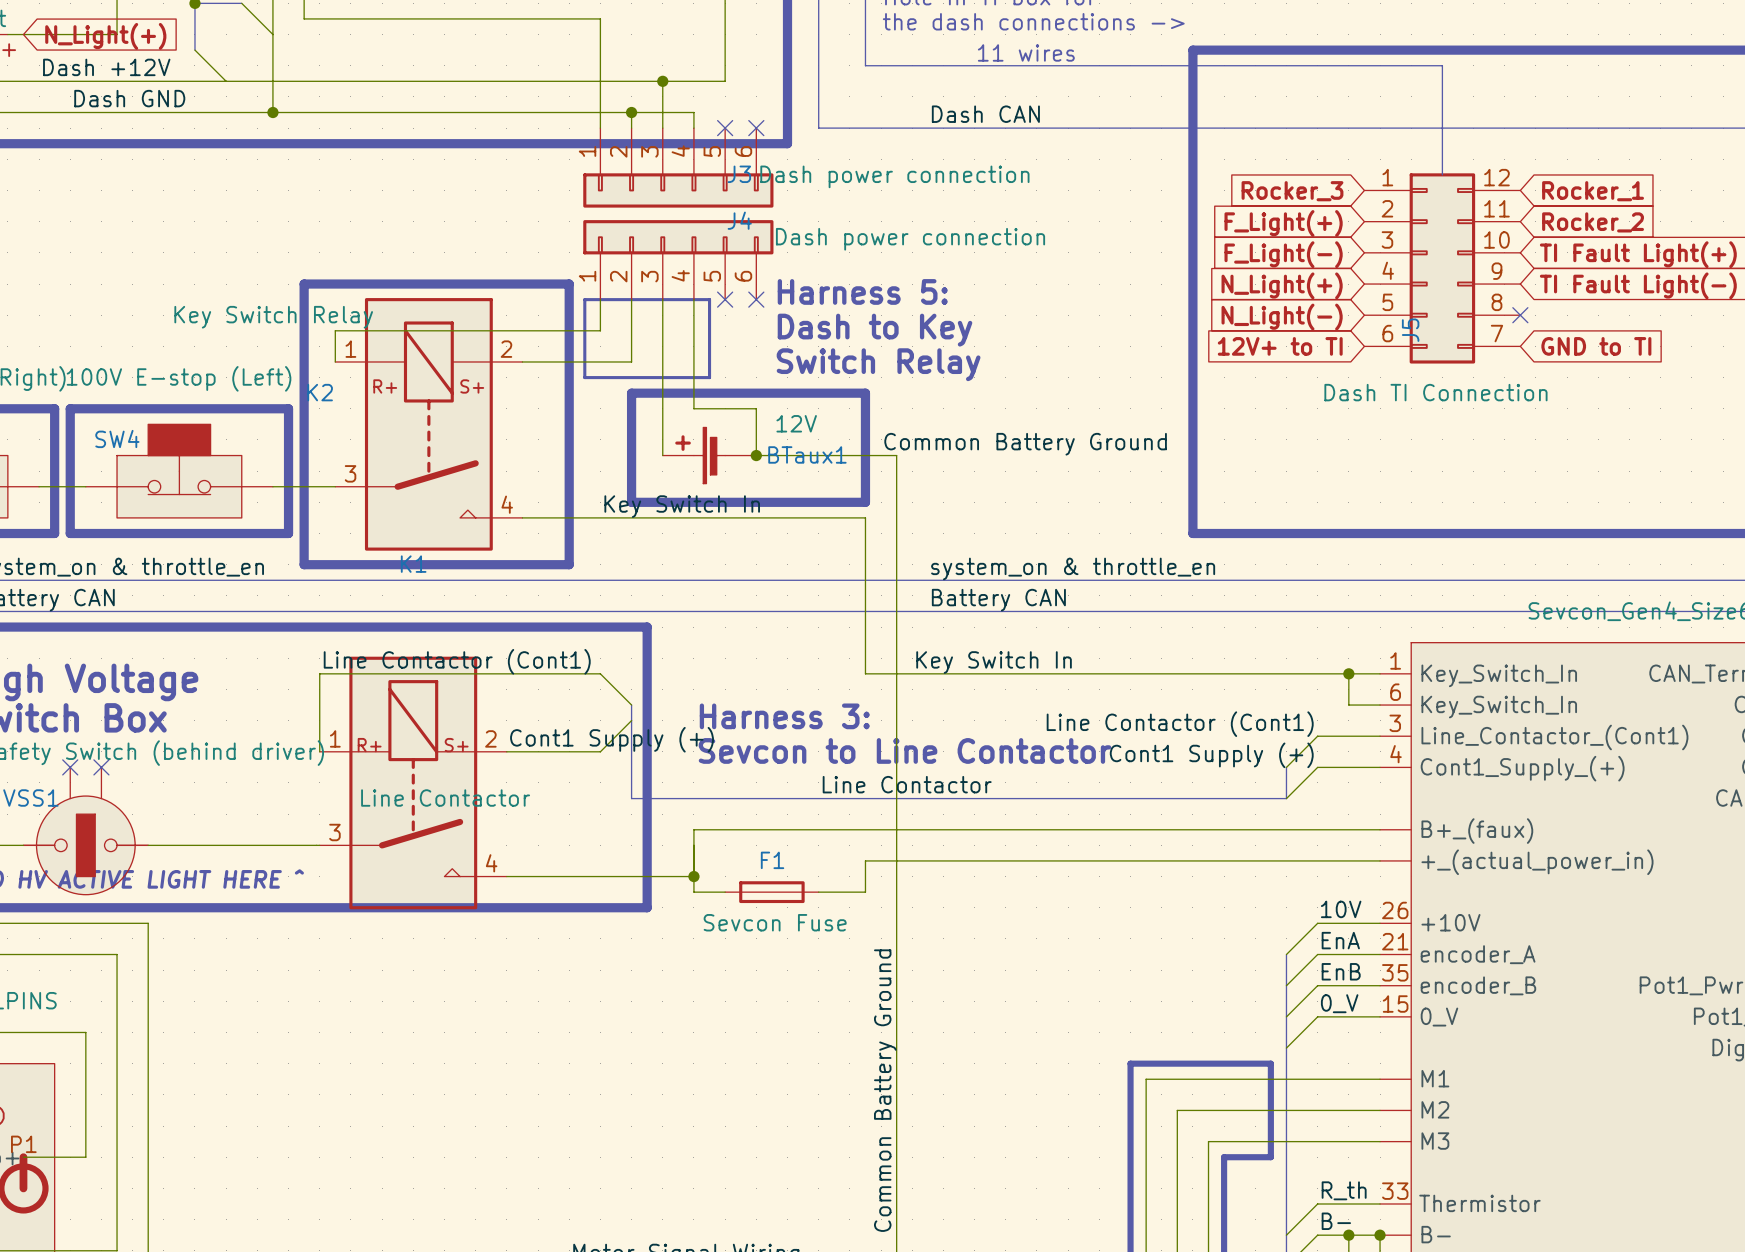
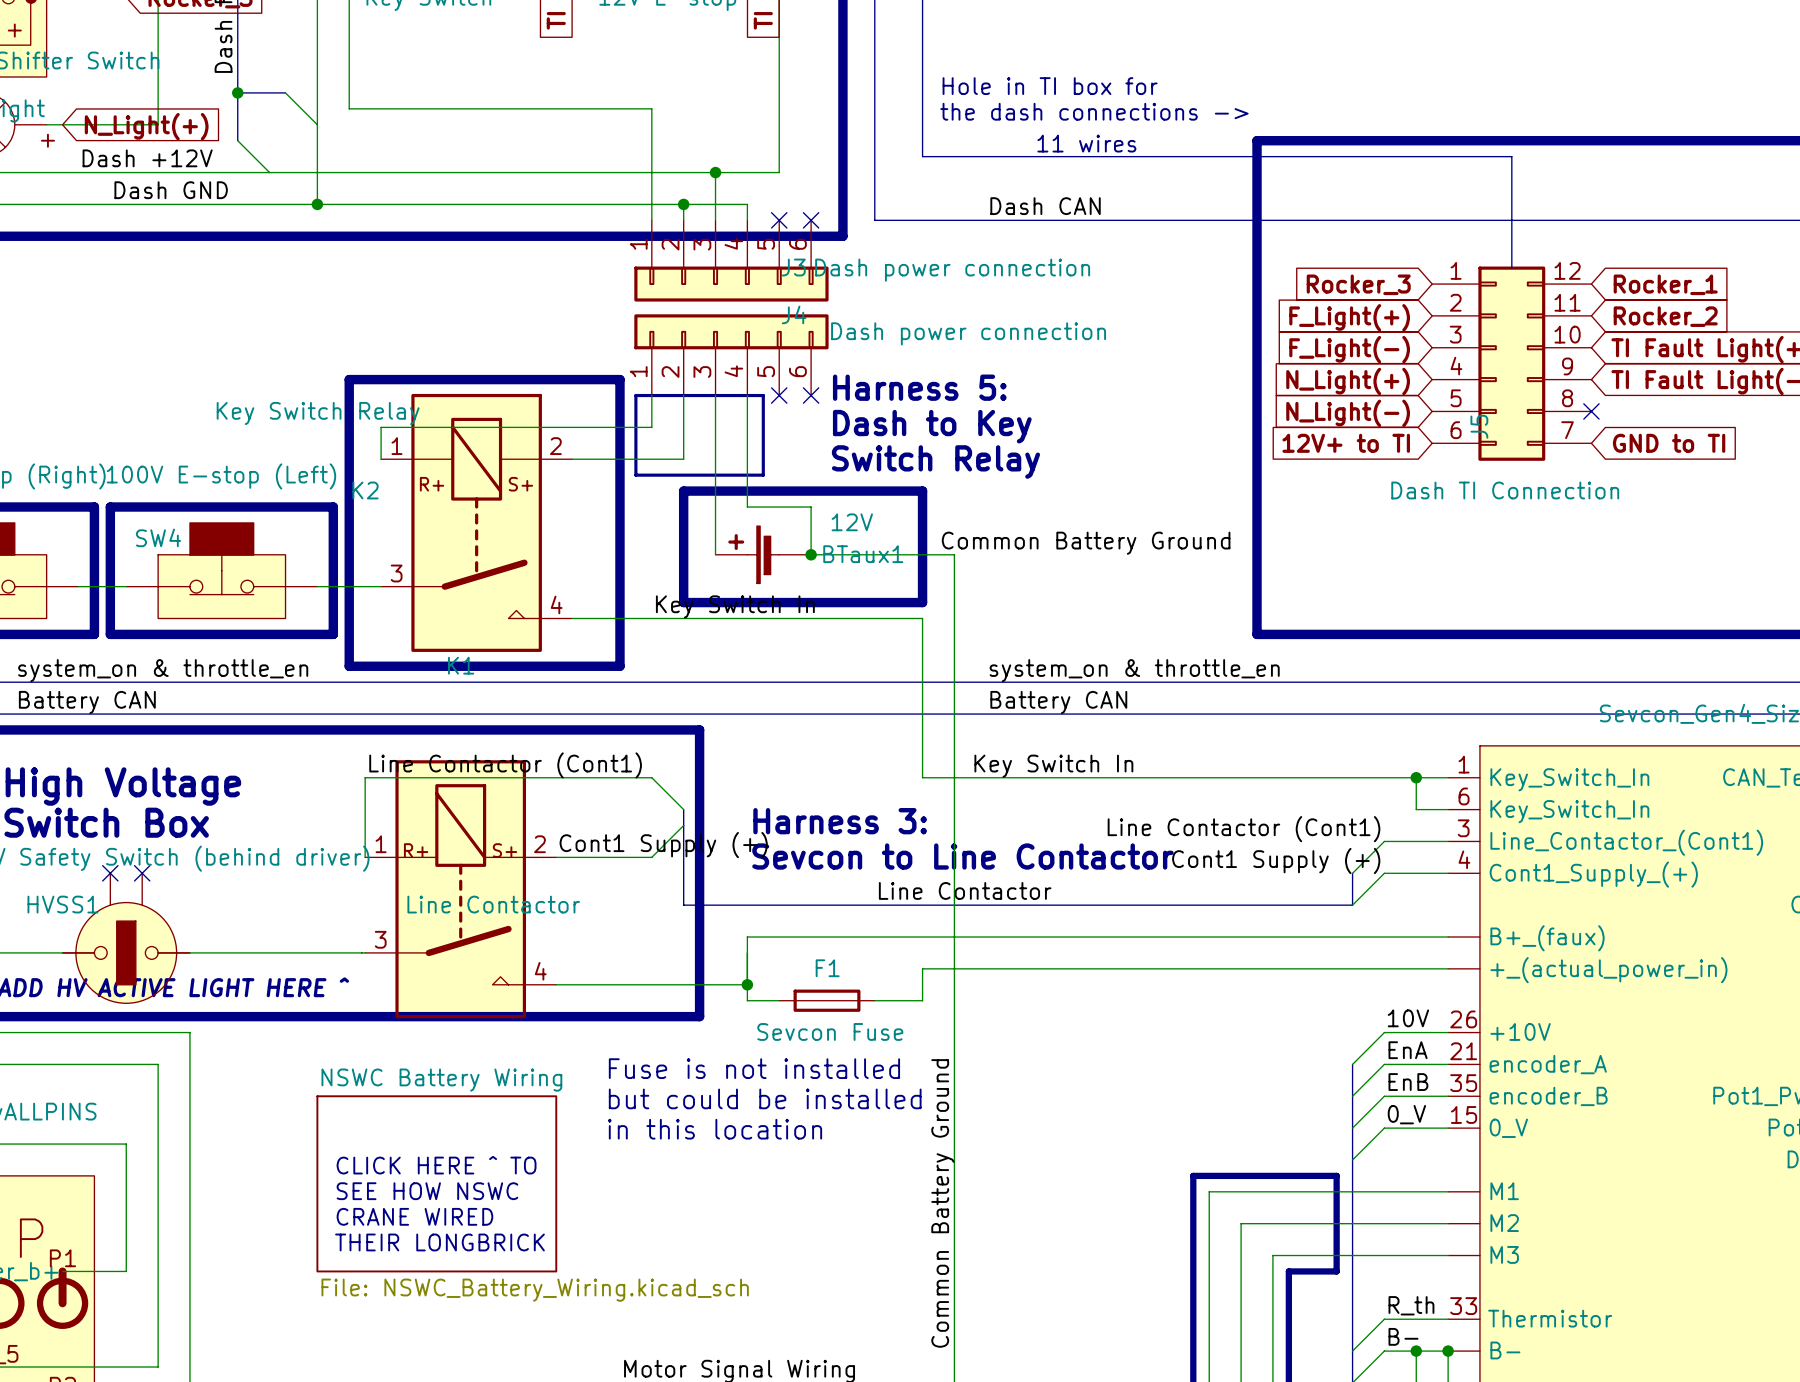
text: none -> Fuse is not installed (754, 1068)
text: none -> but could be installed (765, 1098)
text: none -> in this location (715, 1129)
text: none -> CLICK HERE ^ TO (436, 1165)
sheet NSWC Battery Wiring: none -> File: NSWC_Battery_Wiring.kicad_sch (436, 1183)
text: none -> SEE HOW NSWC (427, 1191)
text: none -> CRANE WIRED (414, 1216)
text: none -> THEIR LONGBRICK (439, 1242)

